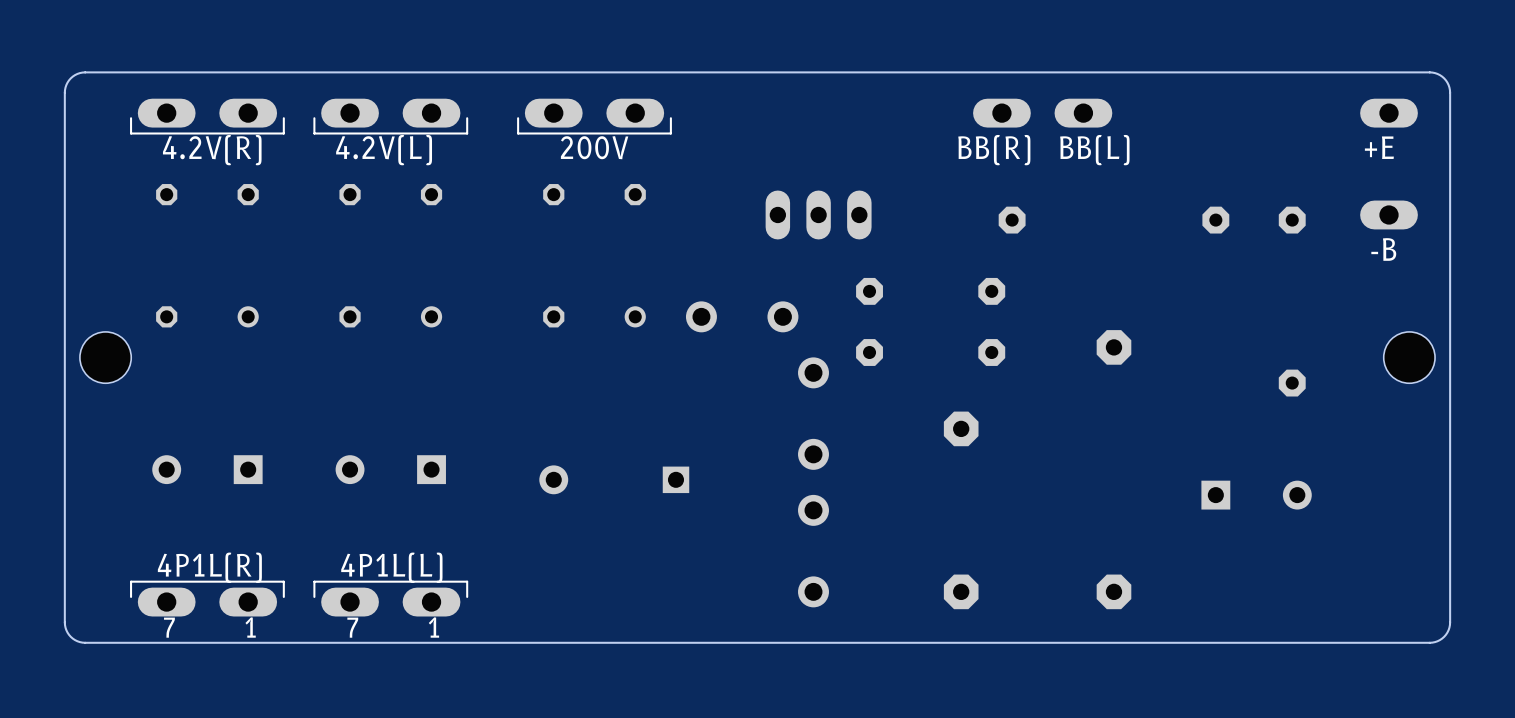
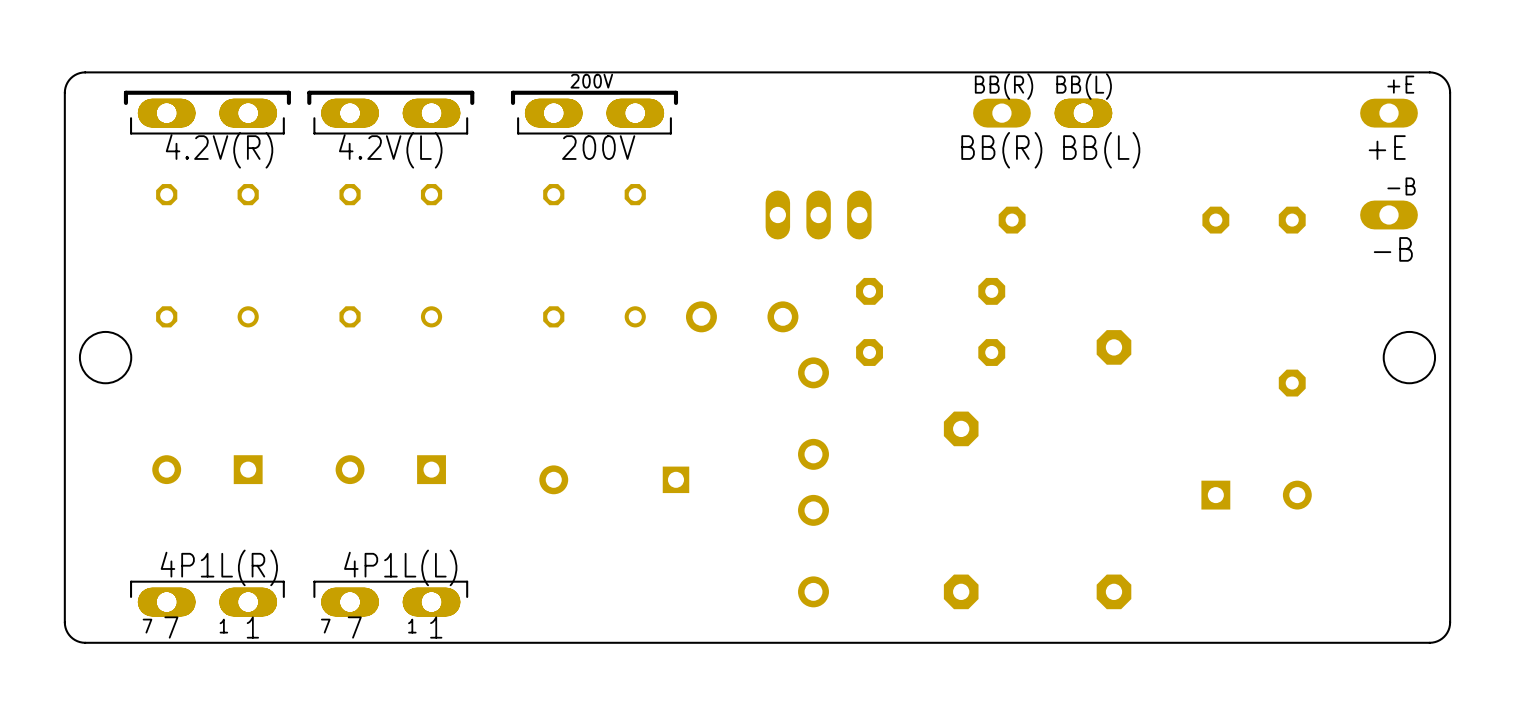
text: none -> 200V (591, 81)
text: none -> +E (1400, 84)
text: none -> BB(R) (1004, 86)
text: none -> BB(L) (1084, 86)
line: none -> (288, 102) (288, 92) (125, 92) (125, 102)
line: none -> (472, 102) (472, 92) (309, 92) (309, 102)
line: none -> (675, 102) (675, 92) (513, 92) (513, 102)
part: none -> (166, 113)
part: none -> (248, 113)
part: none -> (350, 113)
part: none -> (431, 113)
part: none -> (553, 113)
part: none -> (635, 113)
part: none -> (1083, 113)
text: none -> -B (1401, 186)
part: none -> (166, 602)
part: none -> (248, 602)
part: none -> (350, 602)
part: none -> (431, 602)
text: none -> 7 (147, 626)
text: none -> 1 (223, 626)
text: none -> 7 (325, 626)
text: none -> 1 (412, 626)

